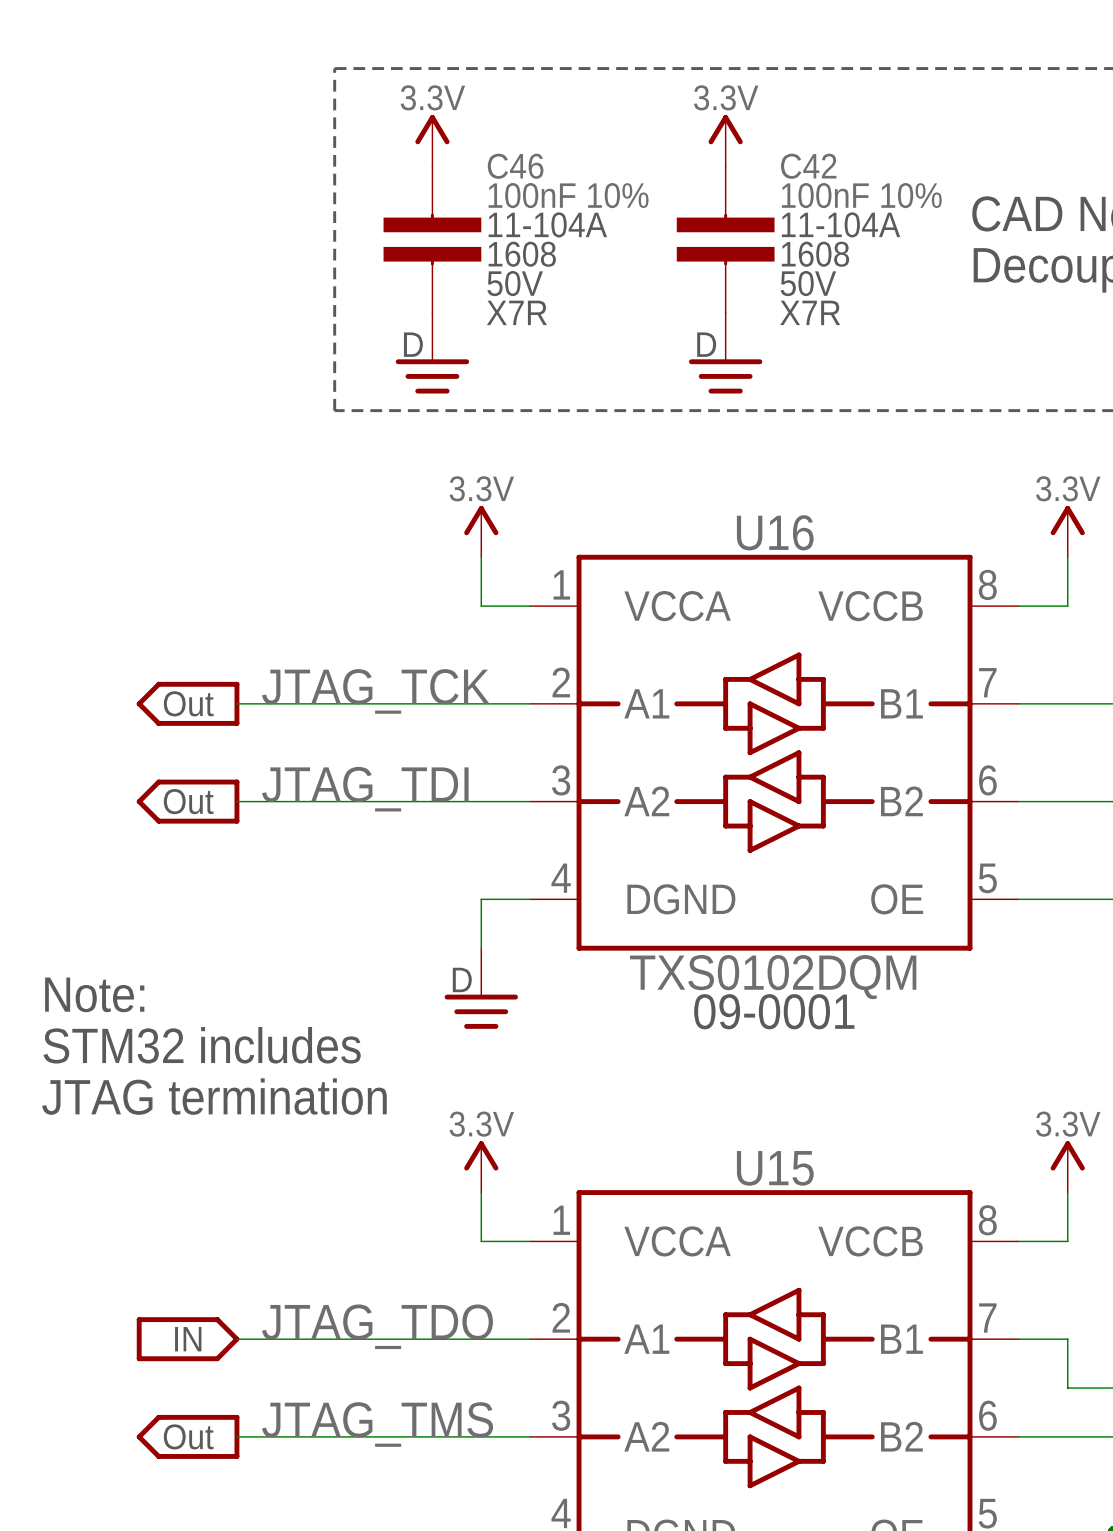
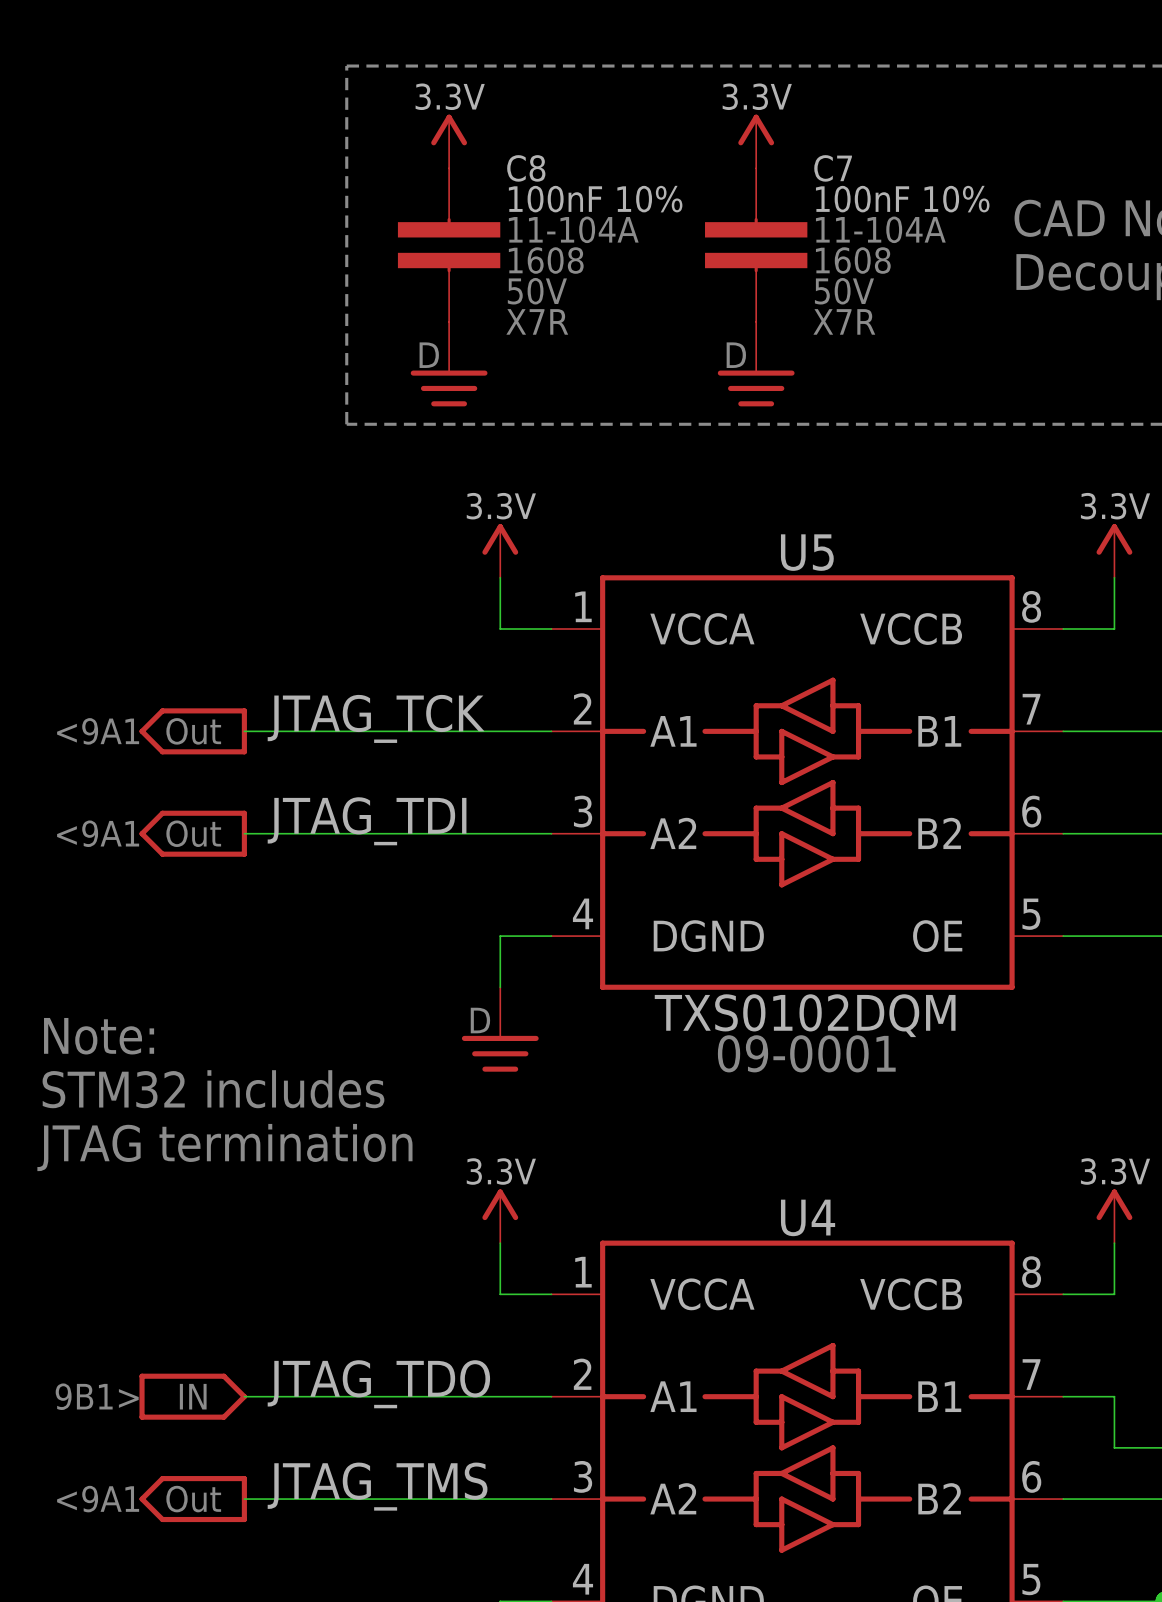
C46 name: C46 (515, 166) -> C8 (526, 168)
C42 name: C42 (808, 166) -> C7 (833, 168)
U16 name: U16 (775, 532) -> U5 (807, 552)
text: none -> <9A1 (98, 731)
text: none -> <9A1 (98, 833)
U15 name: U15 (775, 1168) -> U4 (808, 1217)
text: none -> 9B1> (97, 1396)
text: none -> <9A1 (98, 1499)

